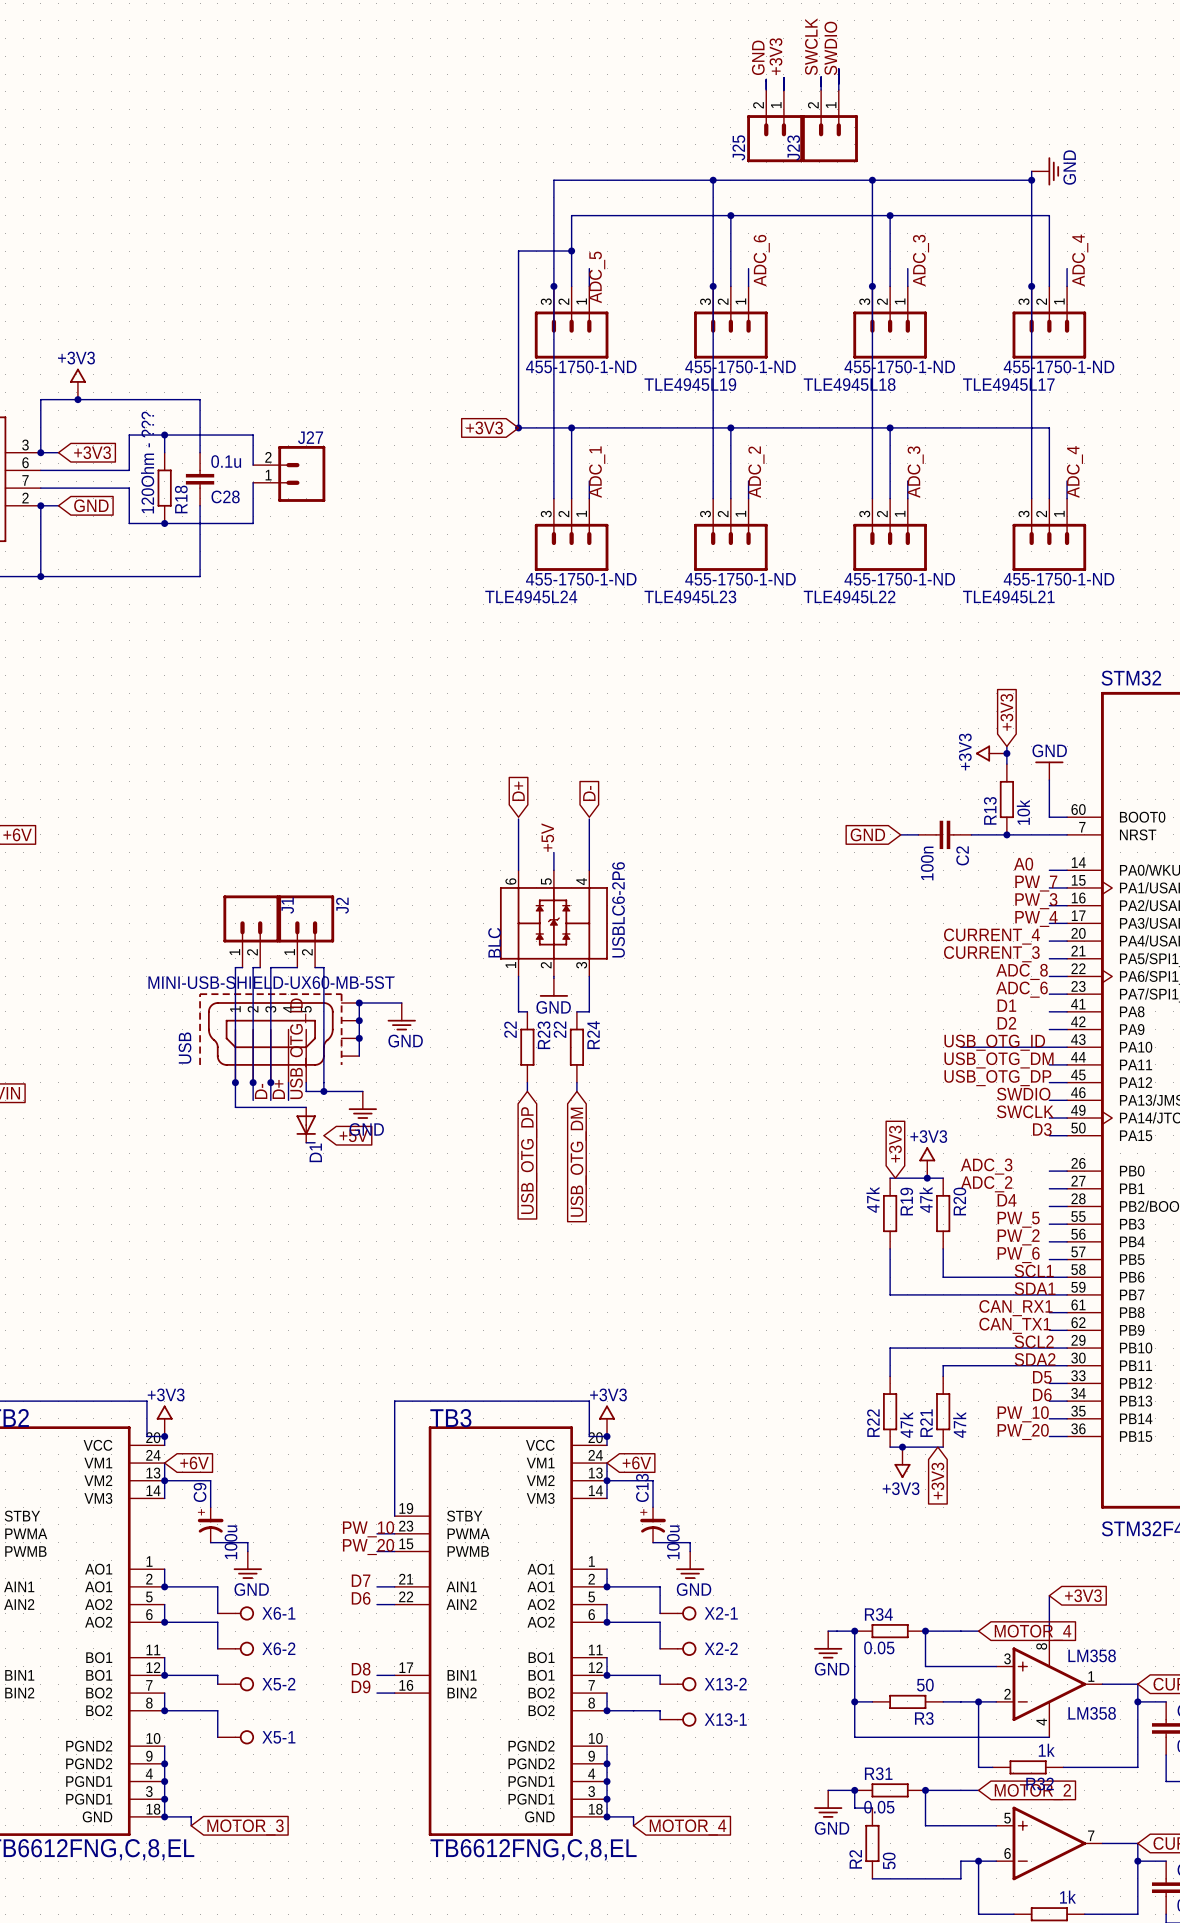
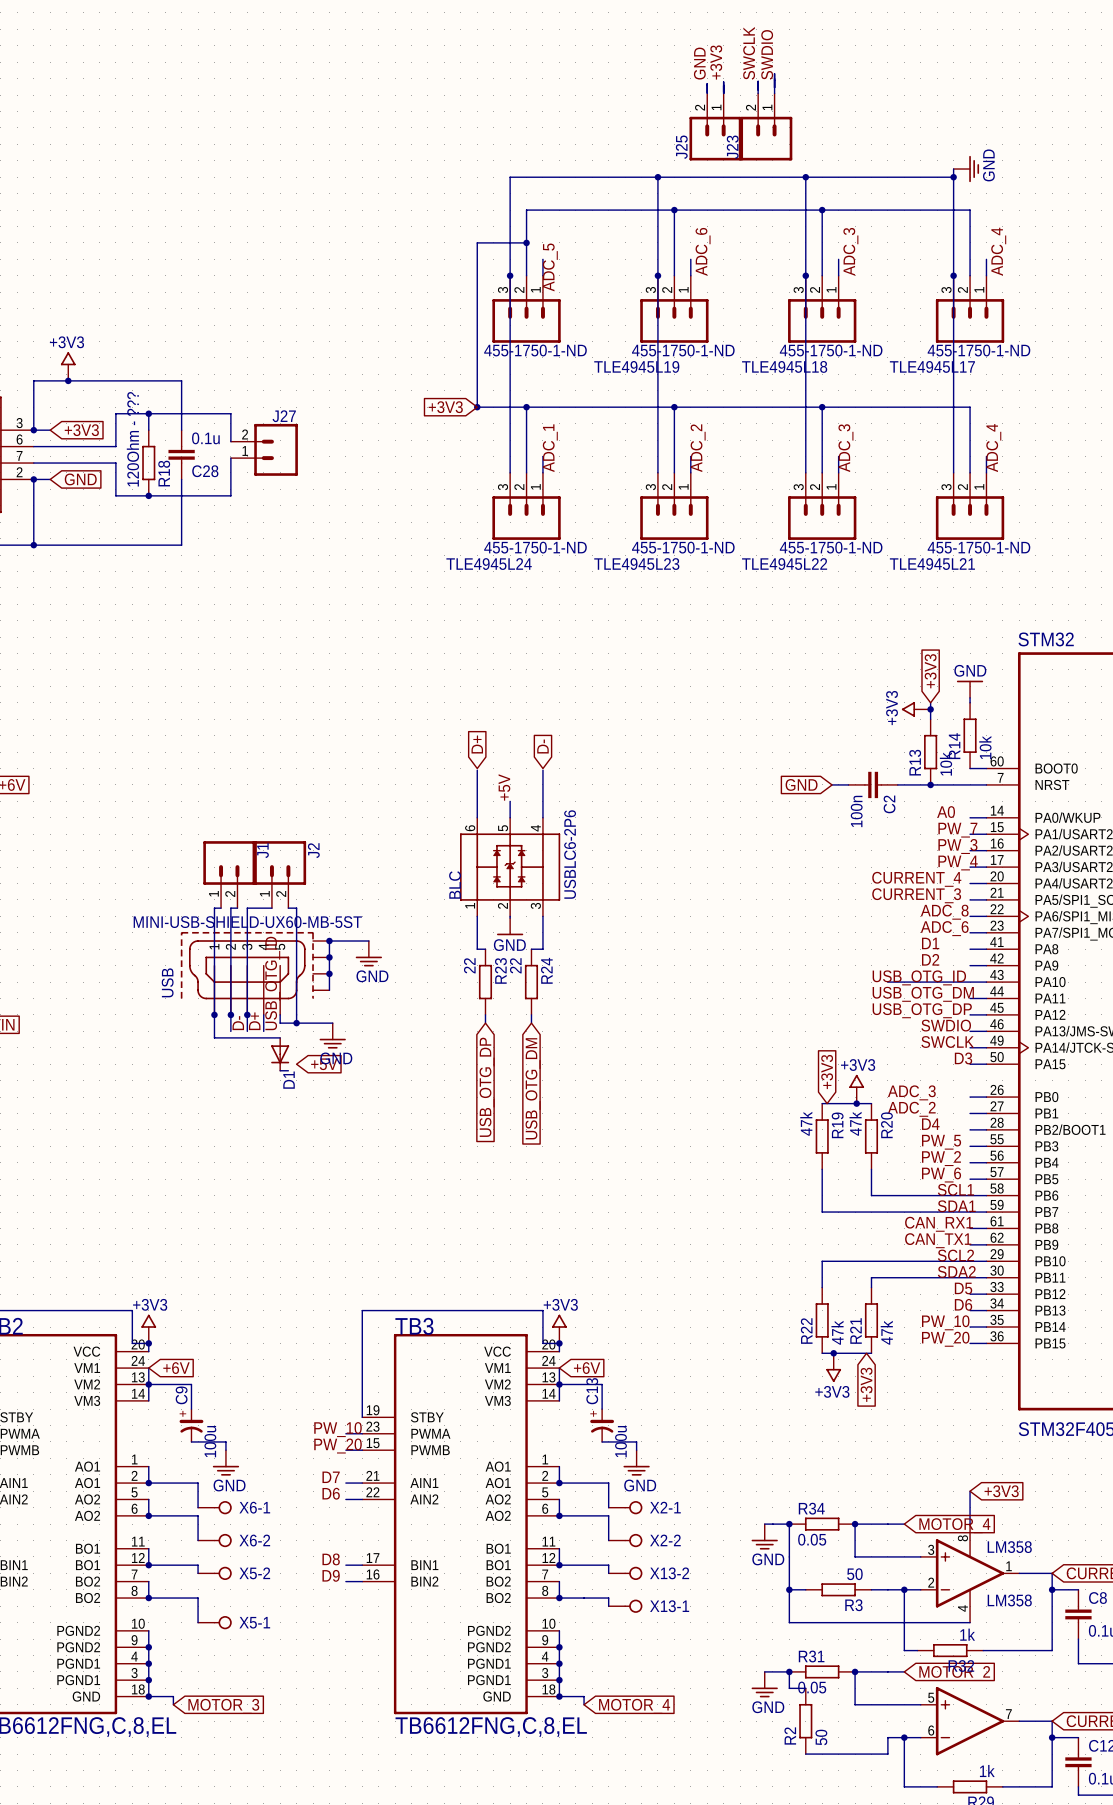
wire: none -> (970, 697) (970, 702)
power symbol position: GND (1049, 770) -> GND (970, 689)
wire: (1049, 780) (1049, 817) -> none
R14: none -> 10k (970, 735)

